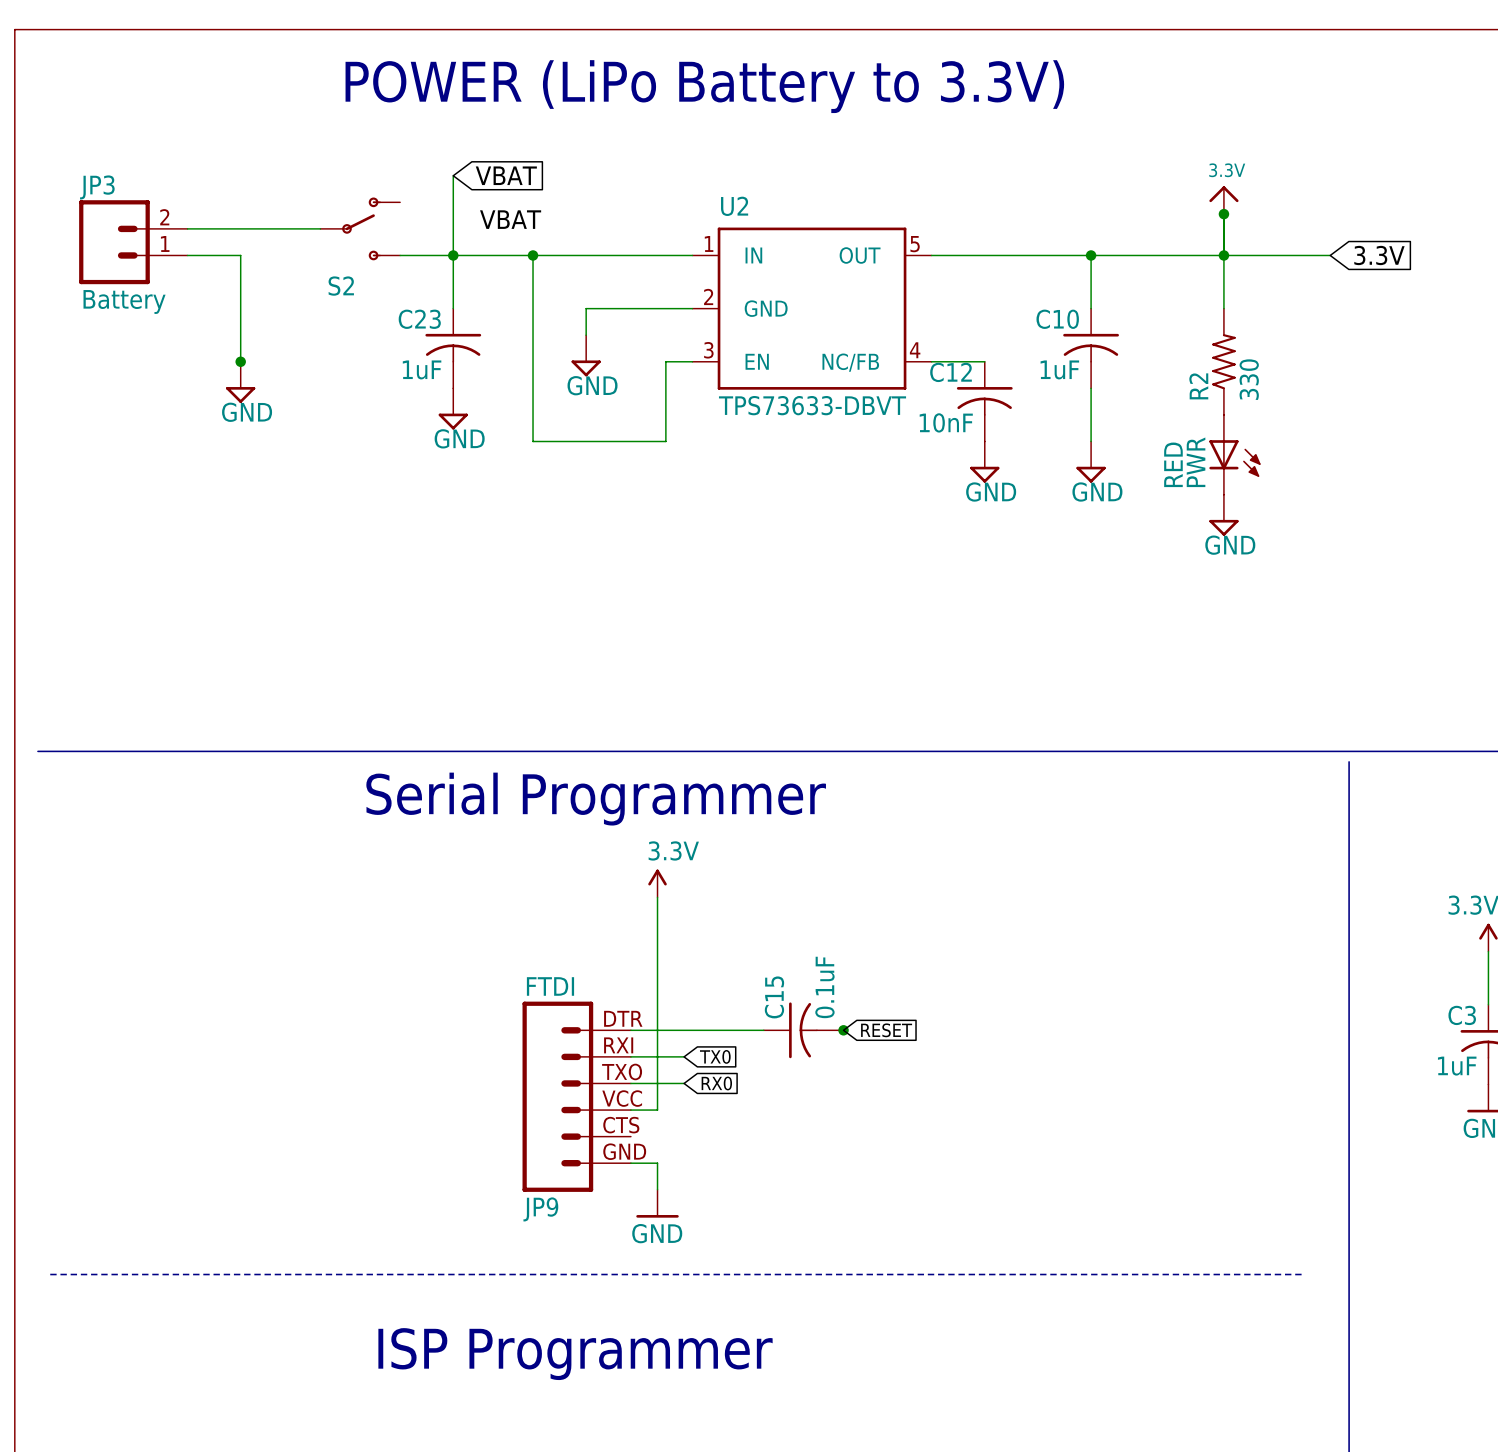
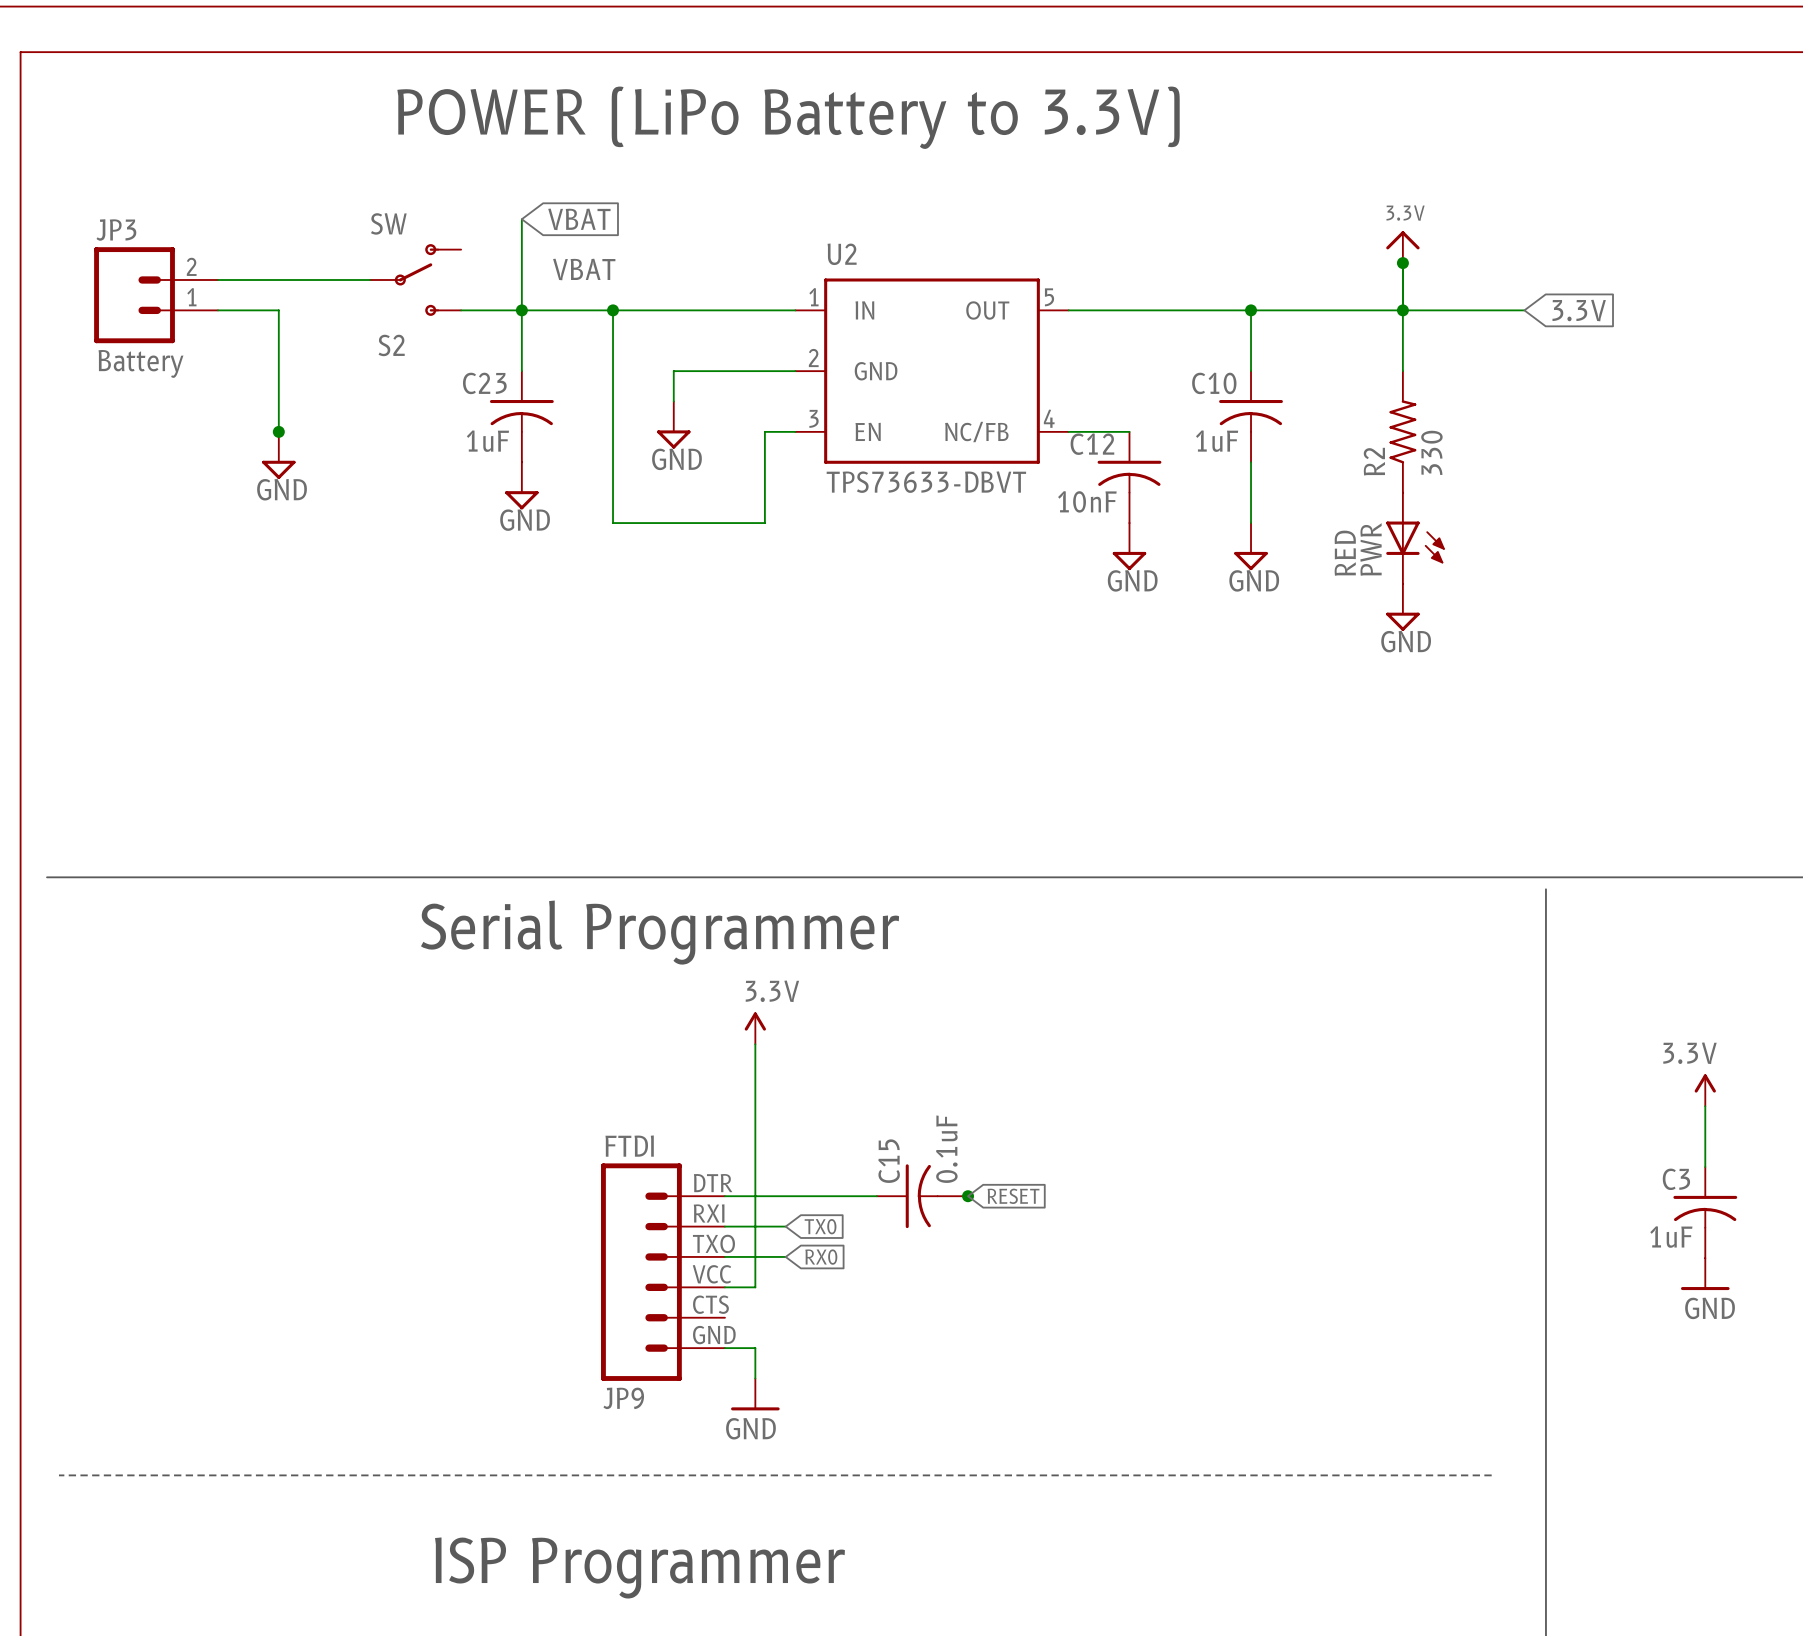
S2 value: none -> SW (388, 223)

